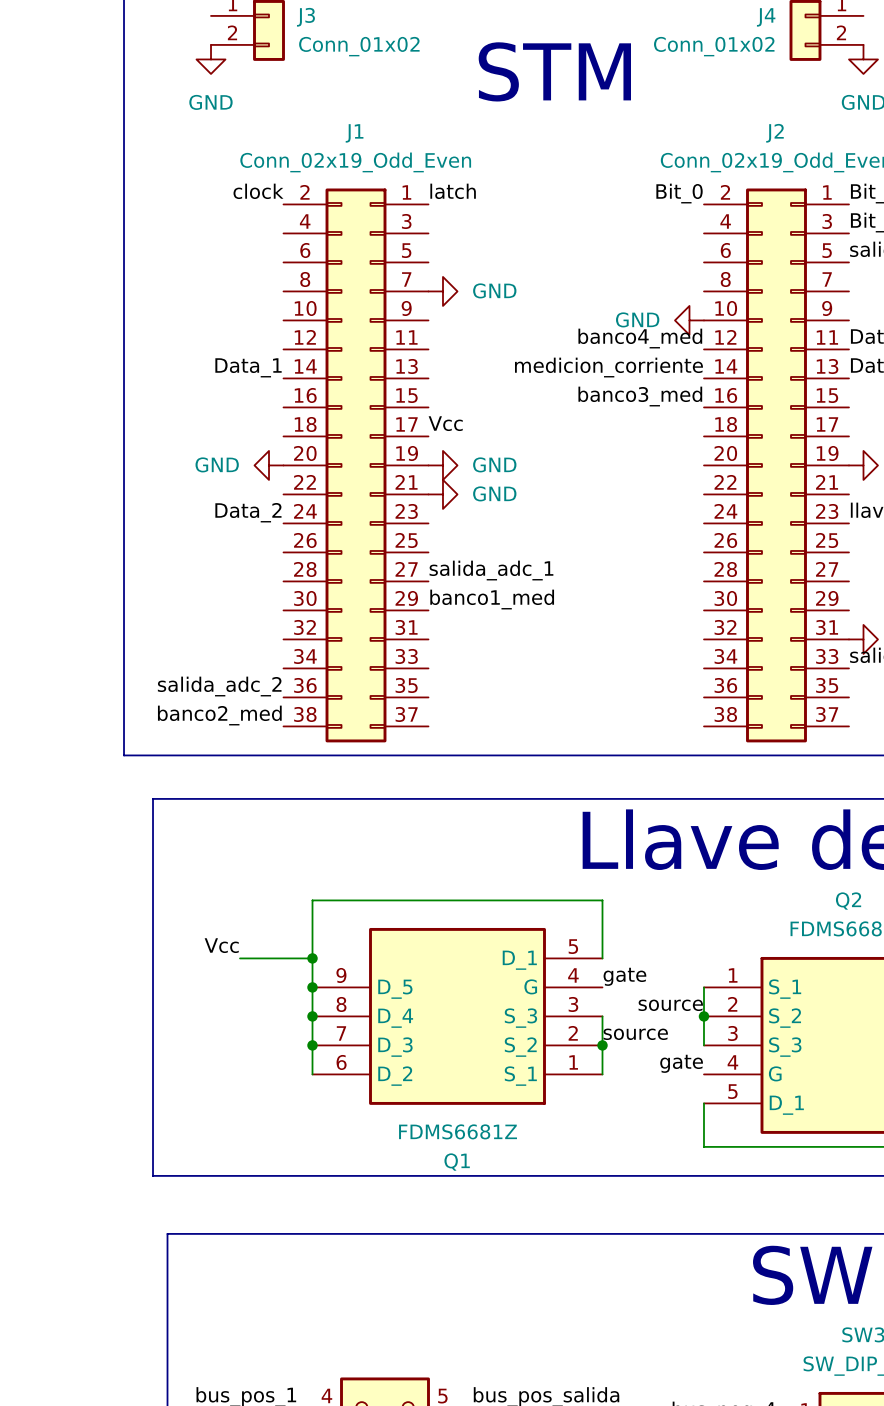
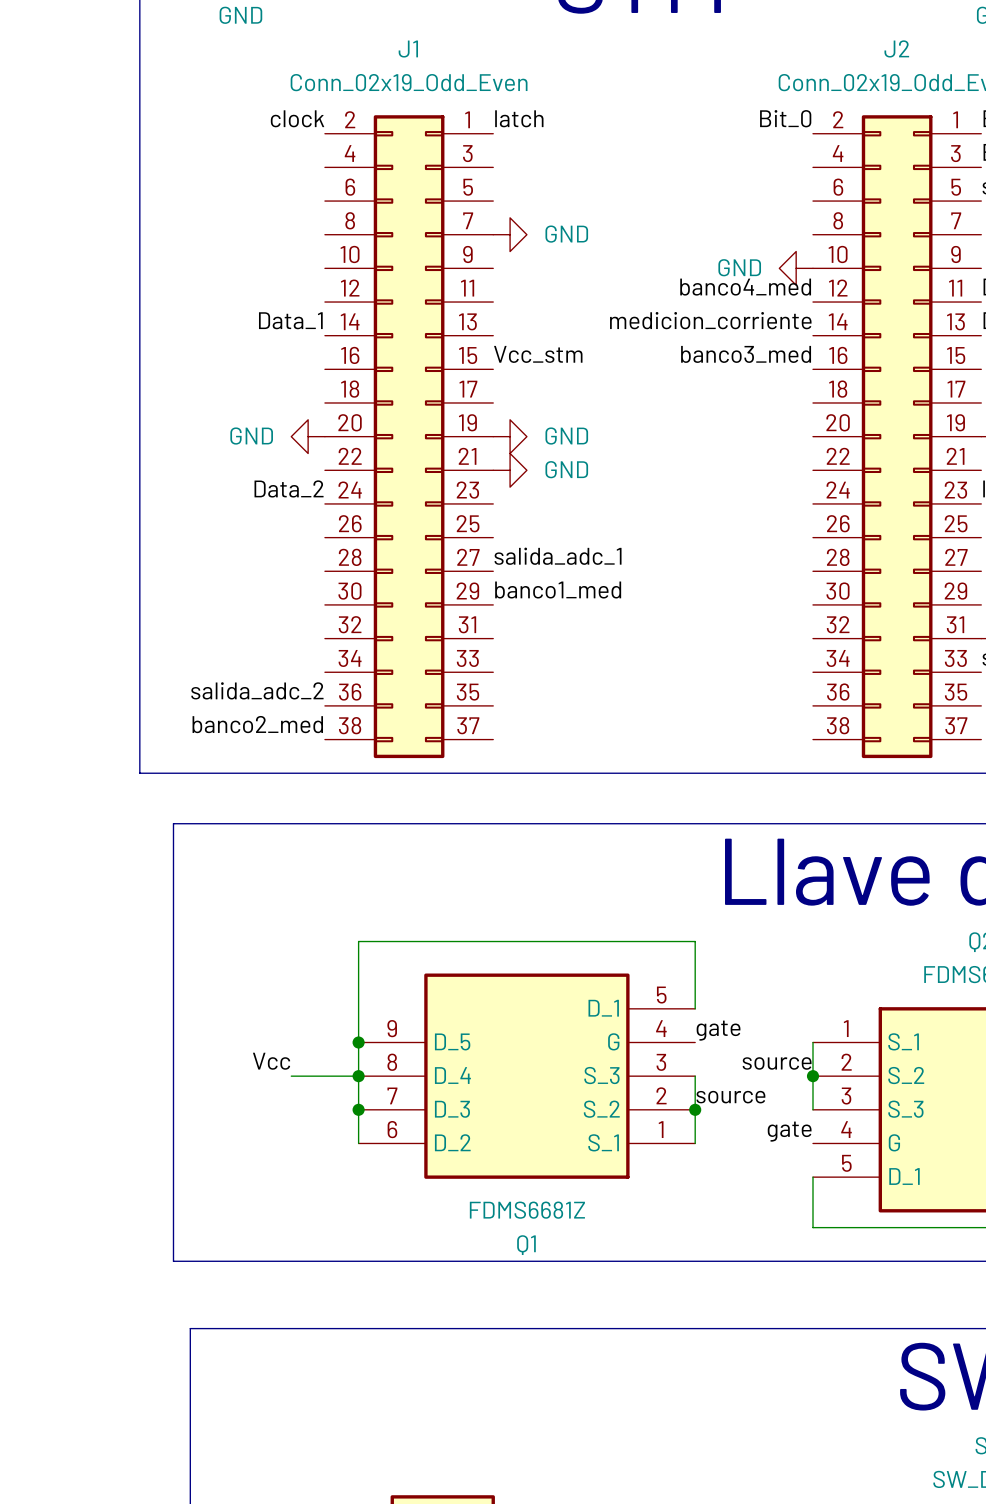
label: none -> Vcc_stm (538, 354)
label: Vcc (445, 423) -> none
label position: Vcc (221, 945) -> Vcc (271, 1061)
wire: (240, 958) (312, 958) -> none
junction: (312, 958) -> none
wire: none -> (291, 1076) (358, 1076)

